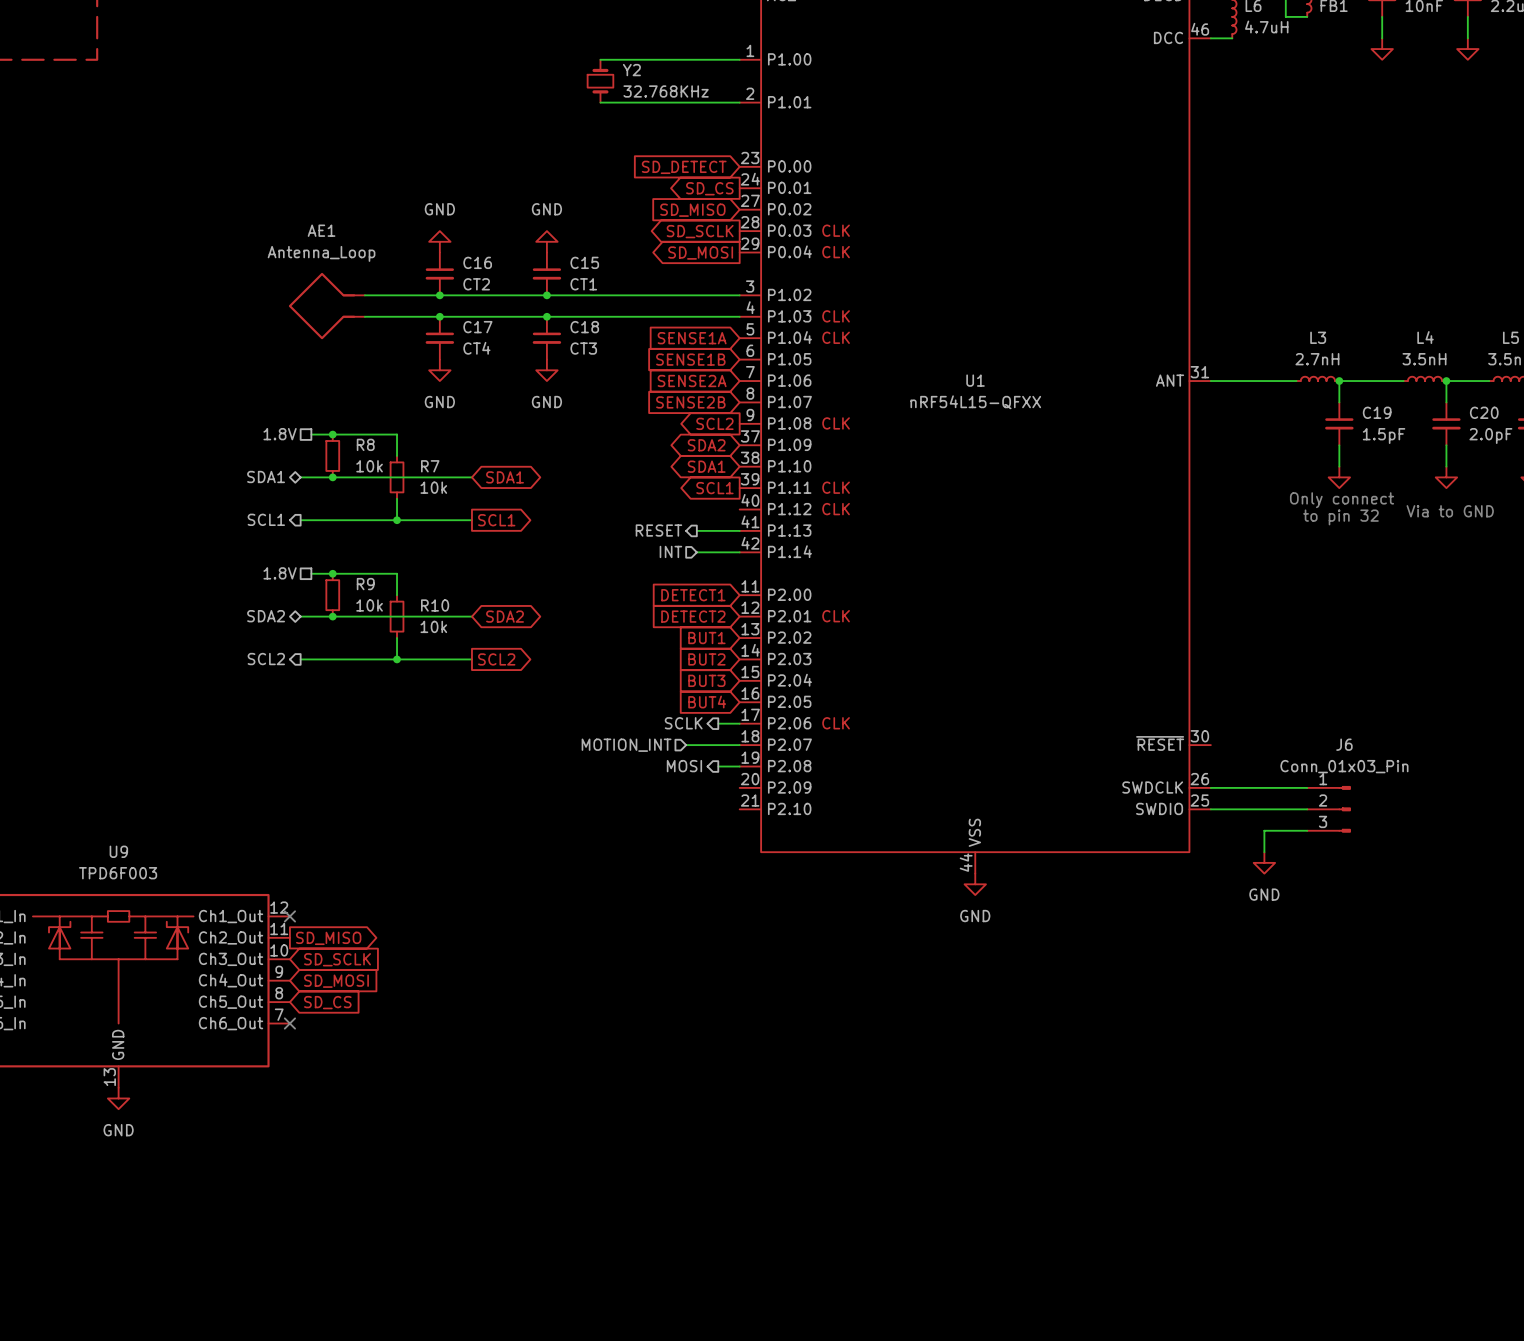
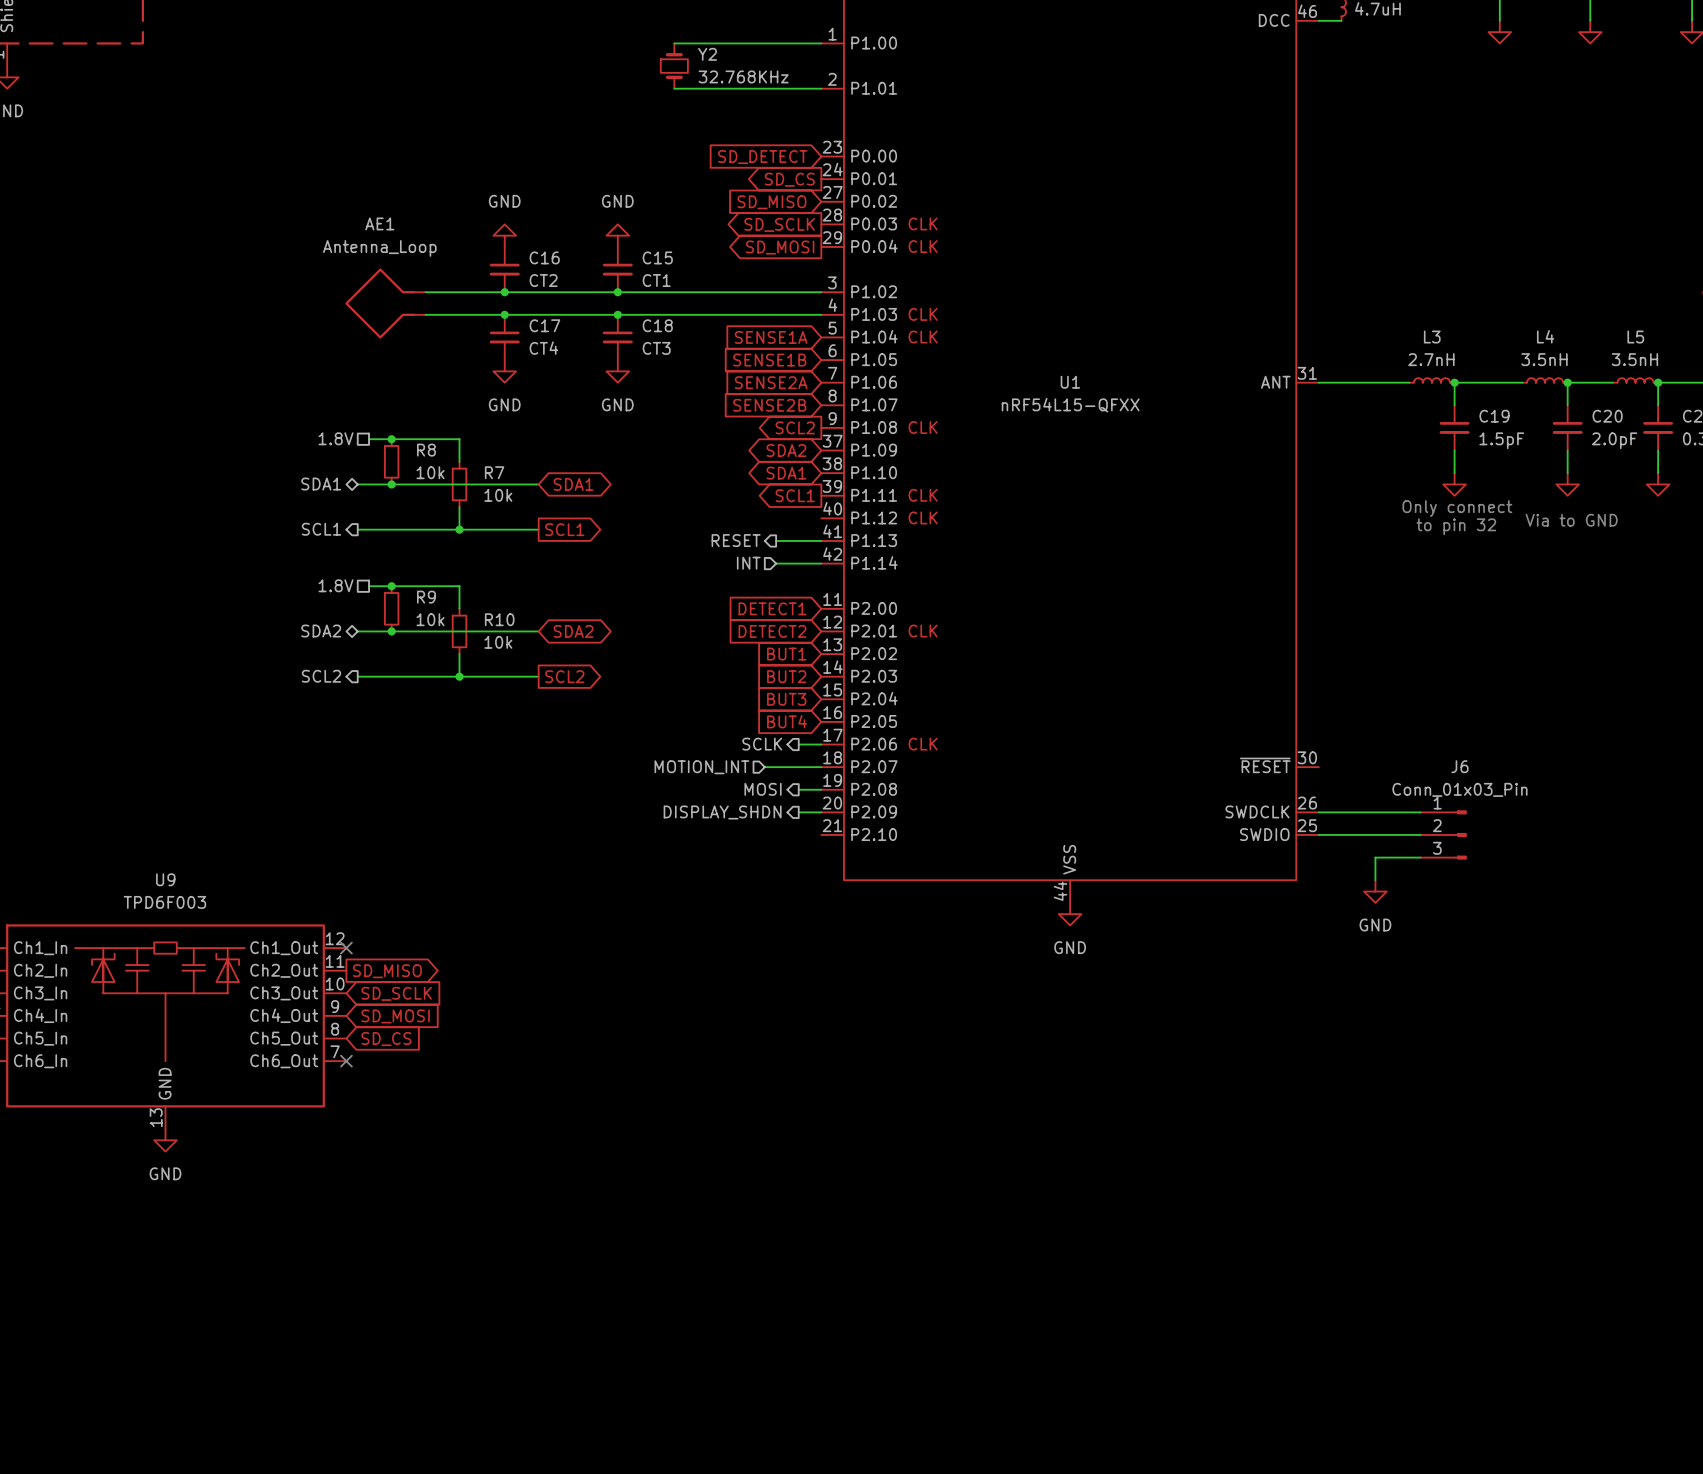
wire: none -> (798, 812) (821, 812)
hierarchical label: none -> DISPLAY_SHDN (722, 812)

